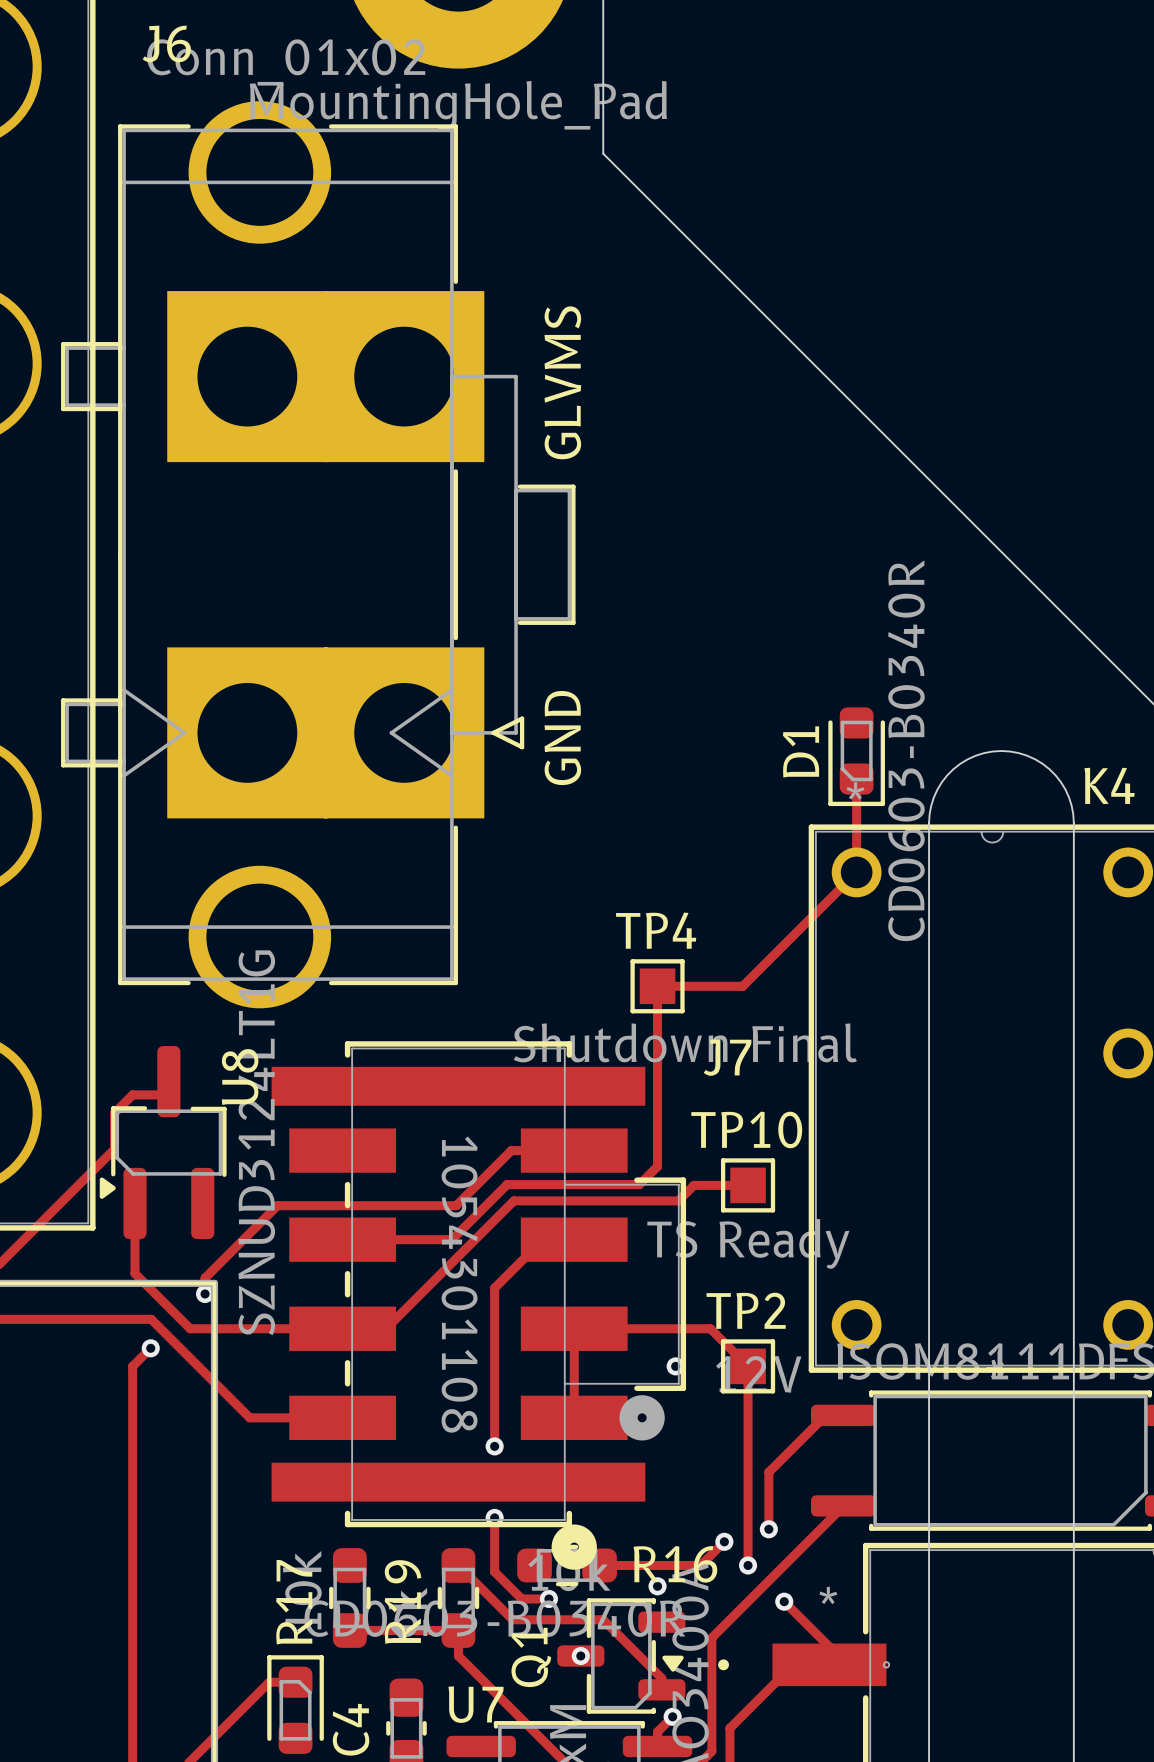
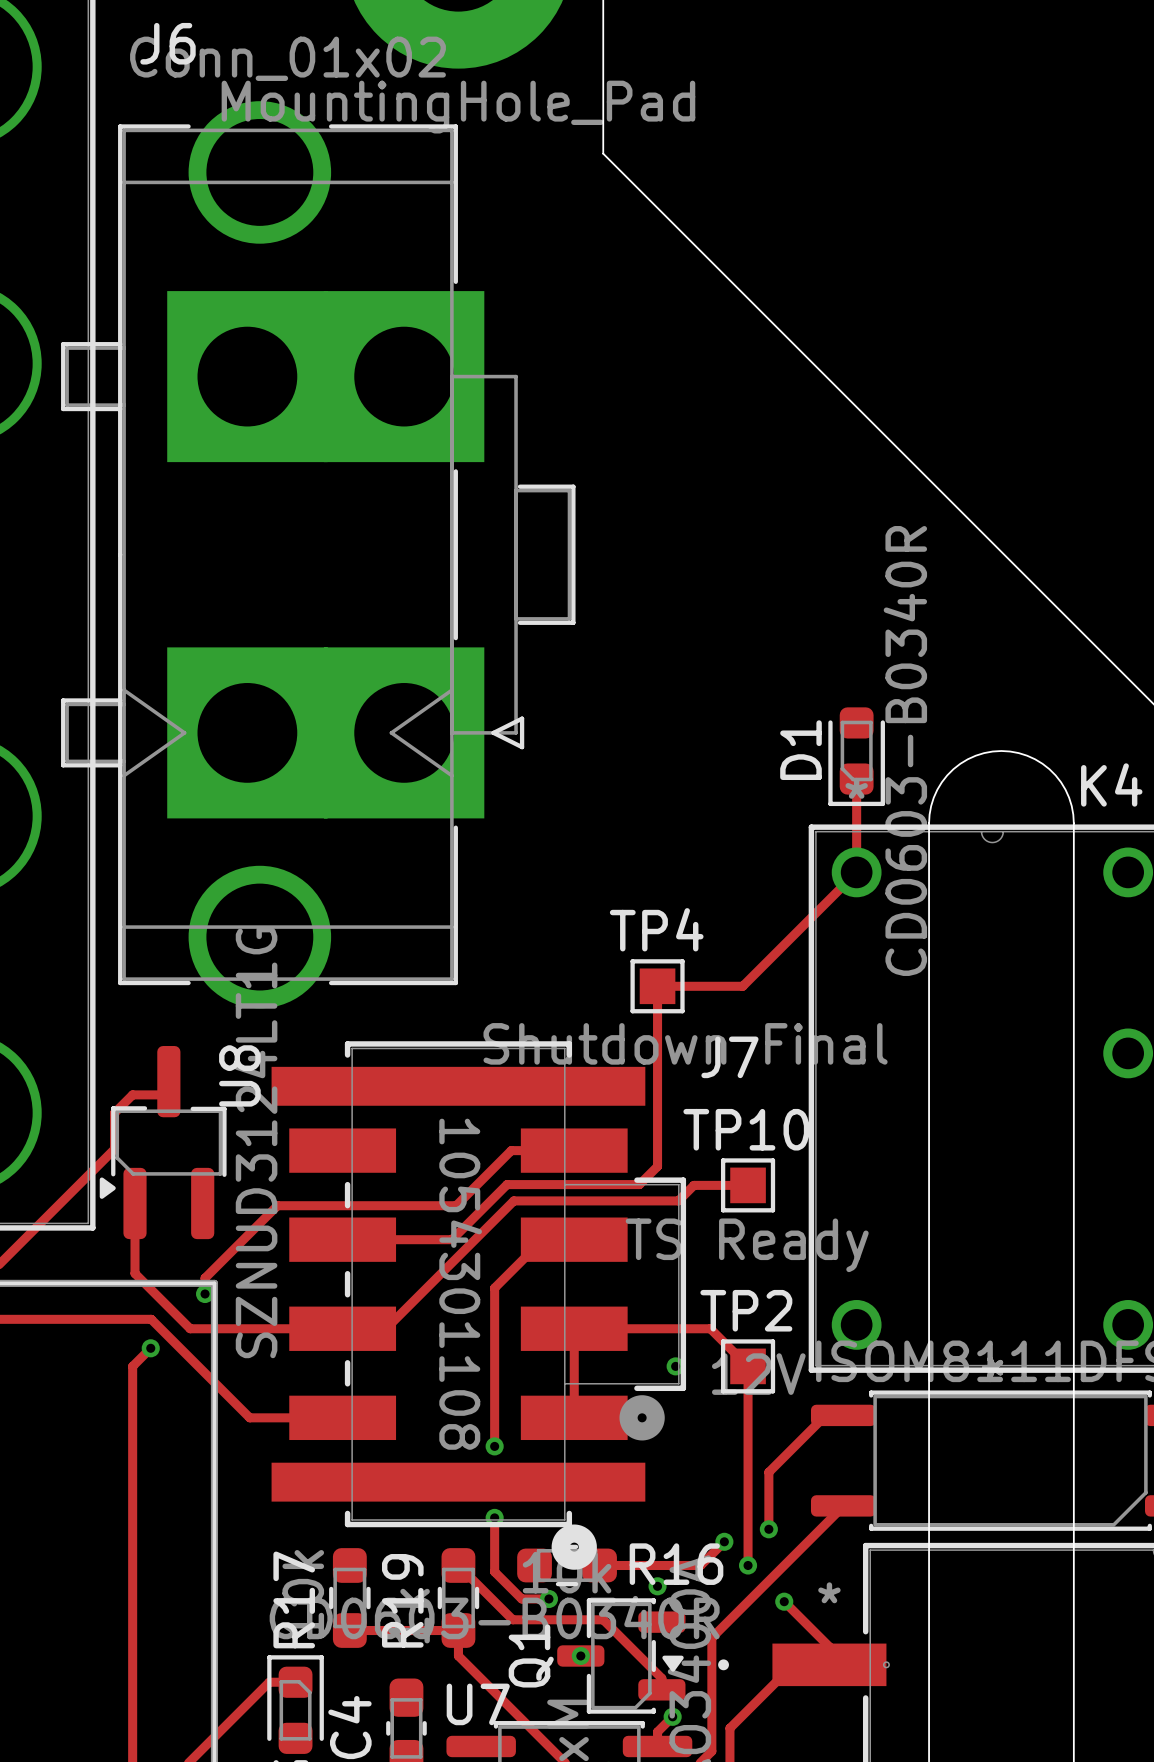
text: GLVMS (562, 382) -> none
text: GND (562, 738) -> none

